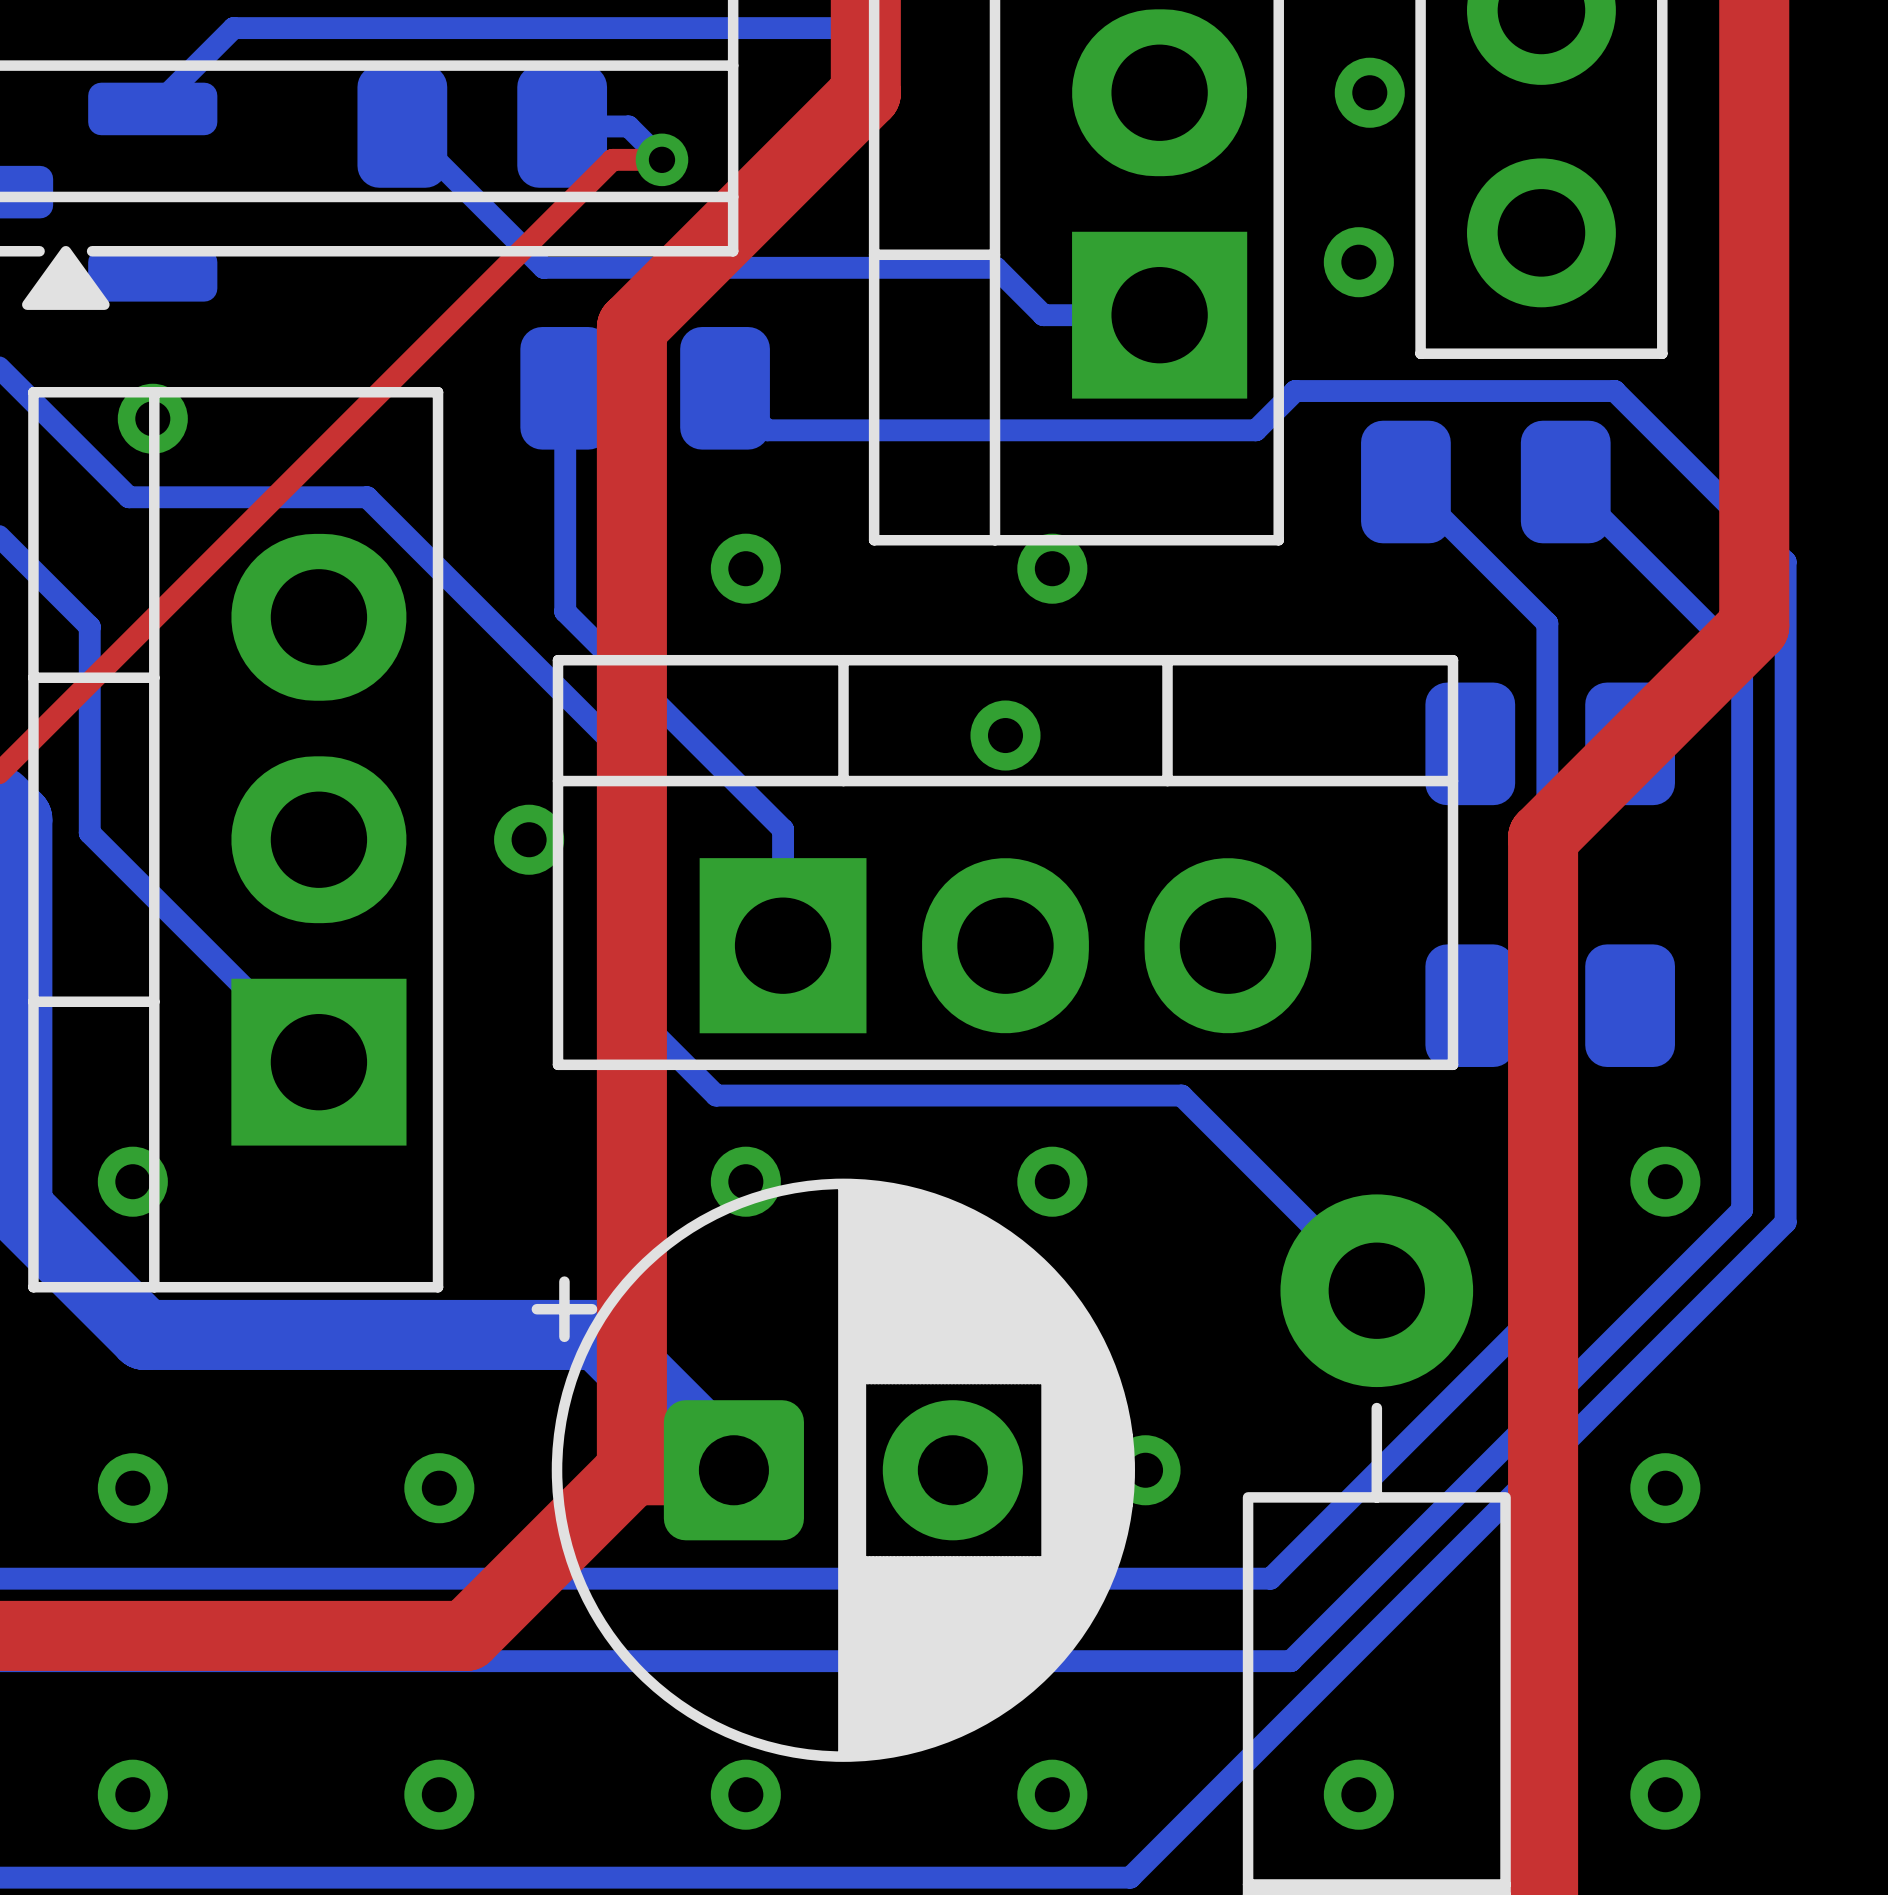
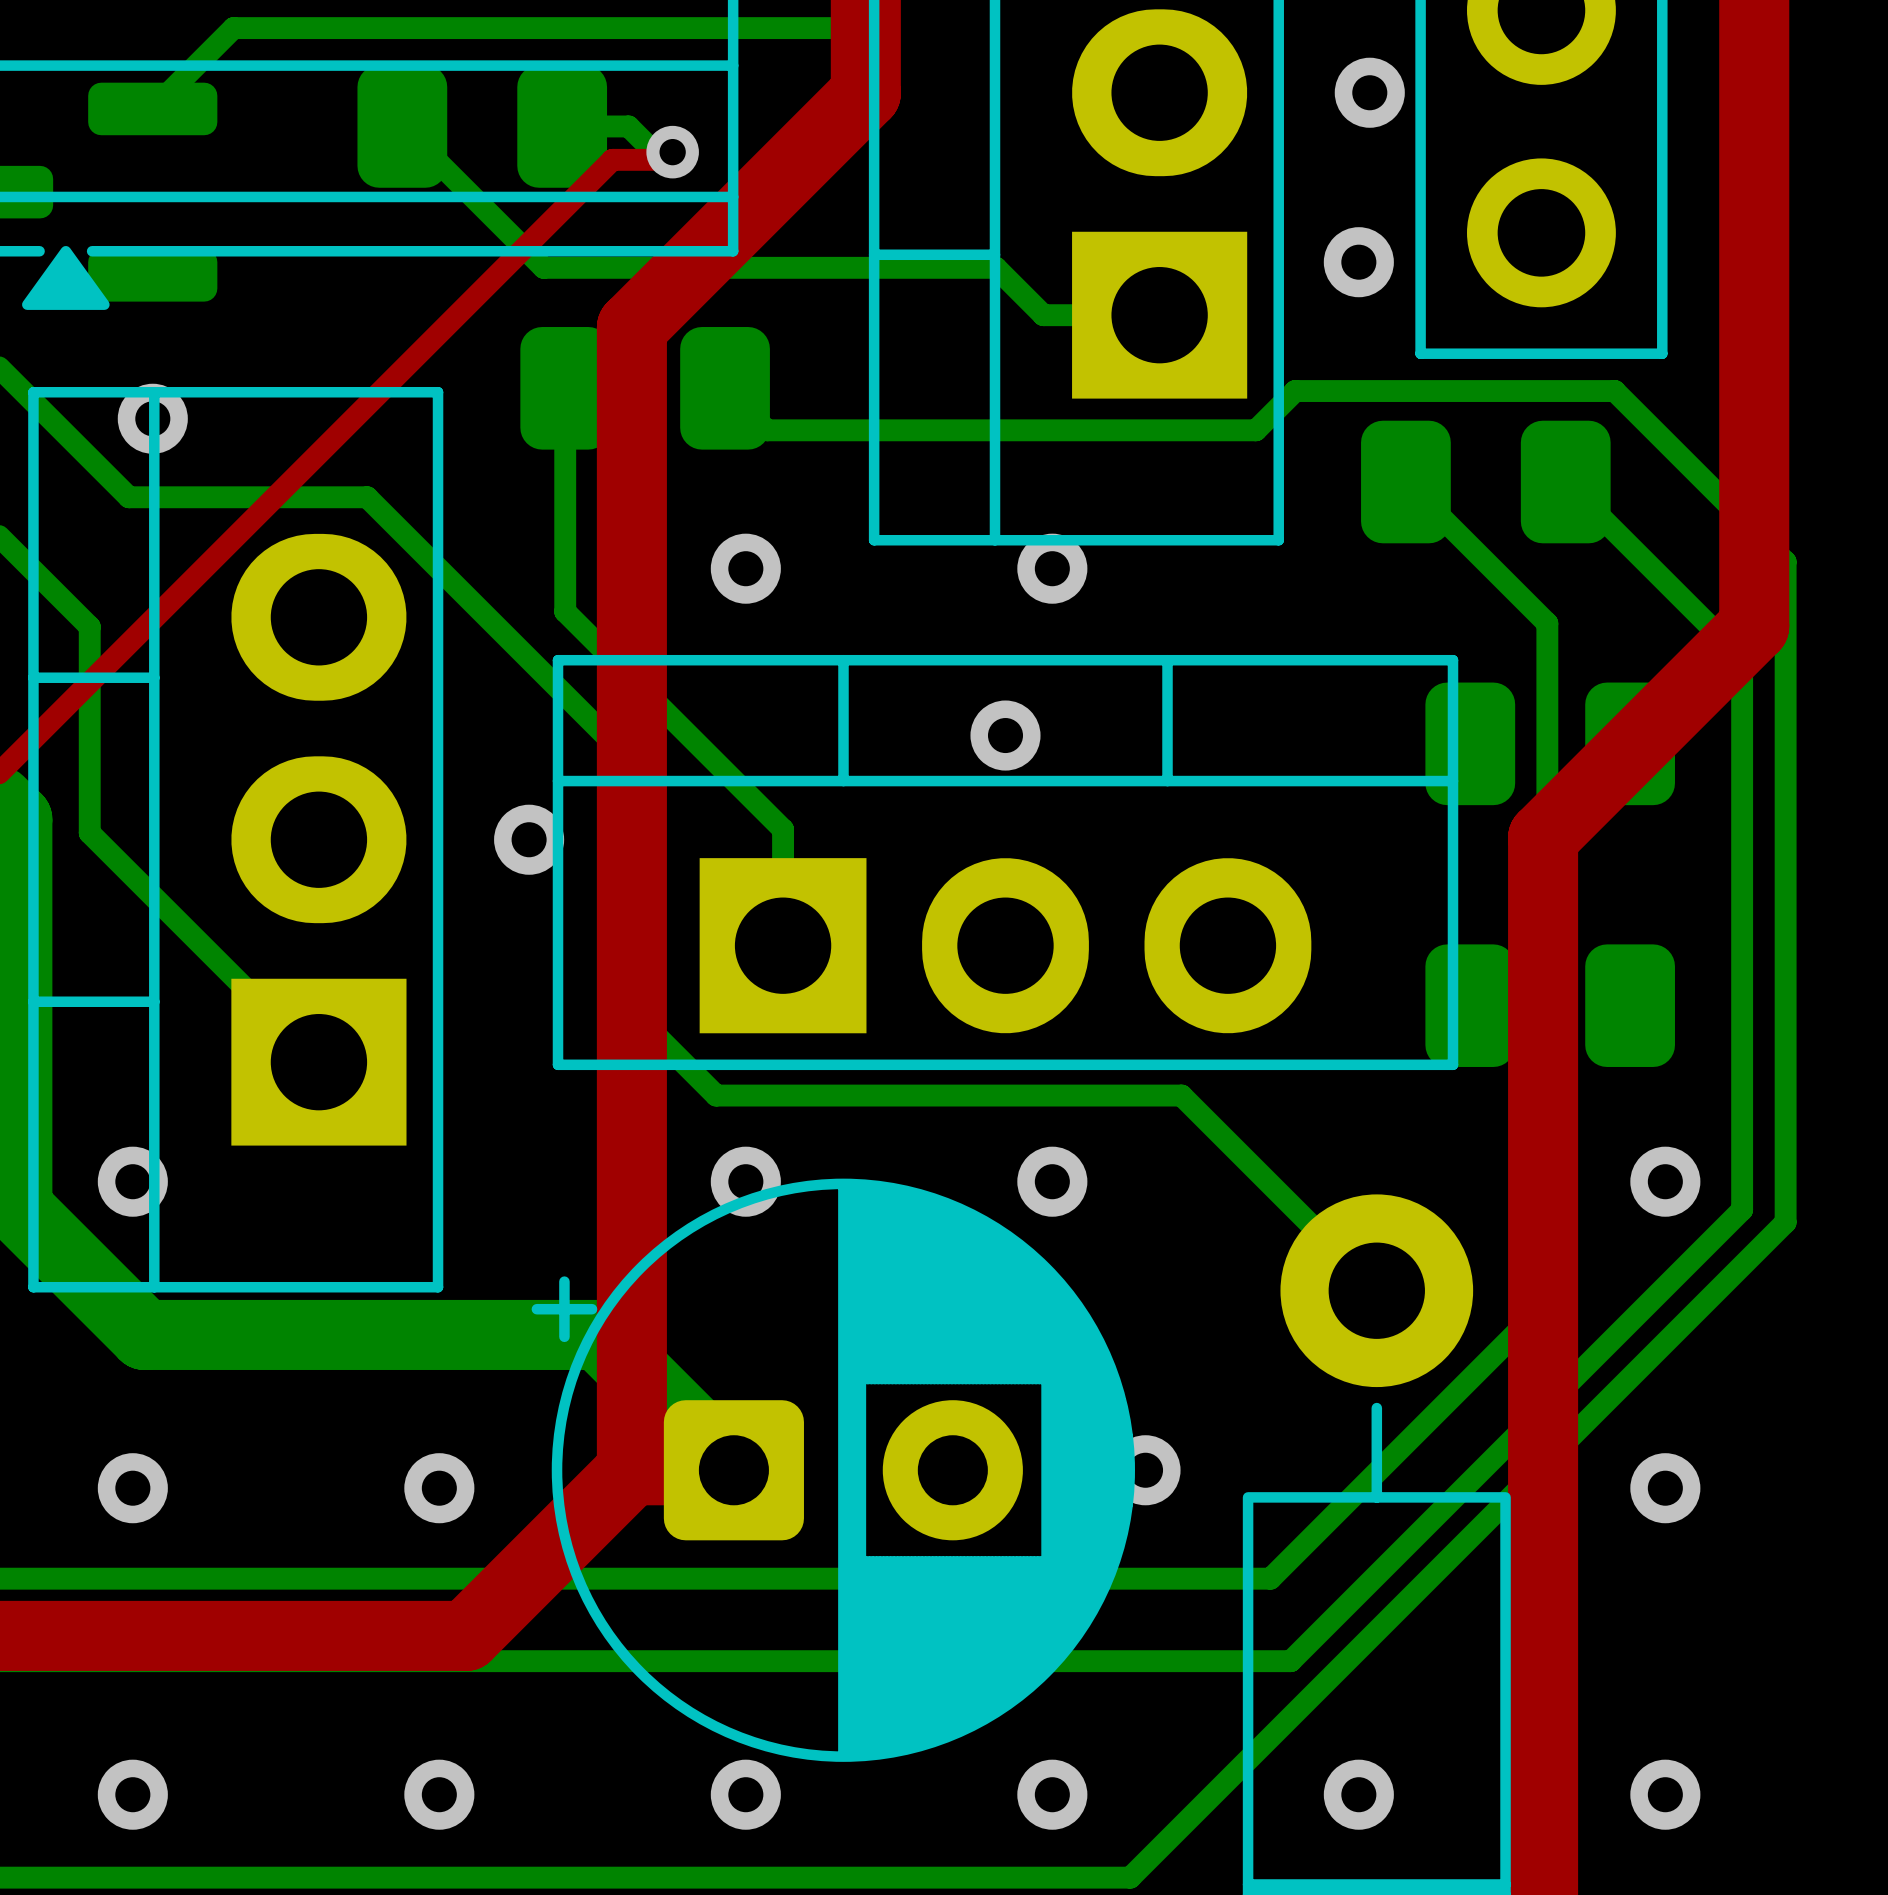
via position: (661, 159) -> (672, 152)

